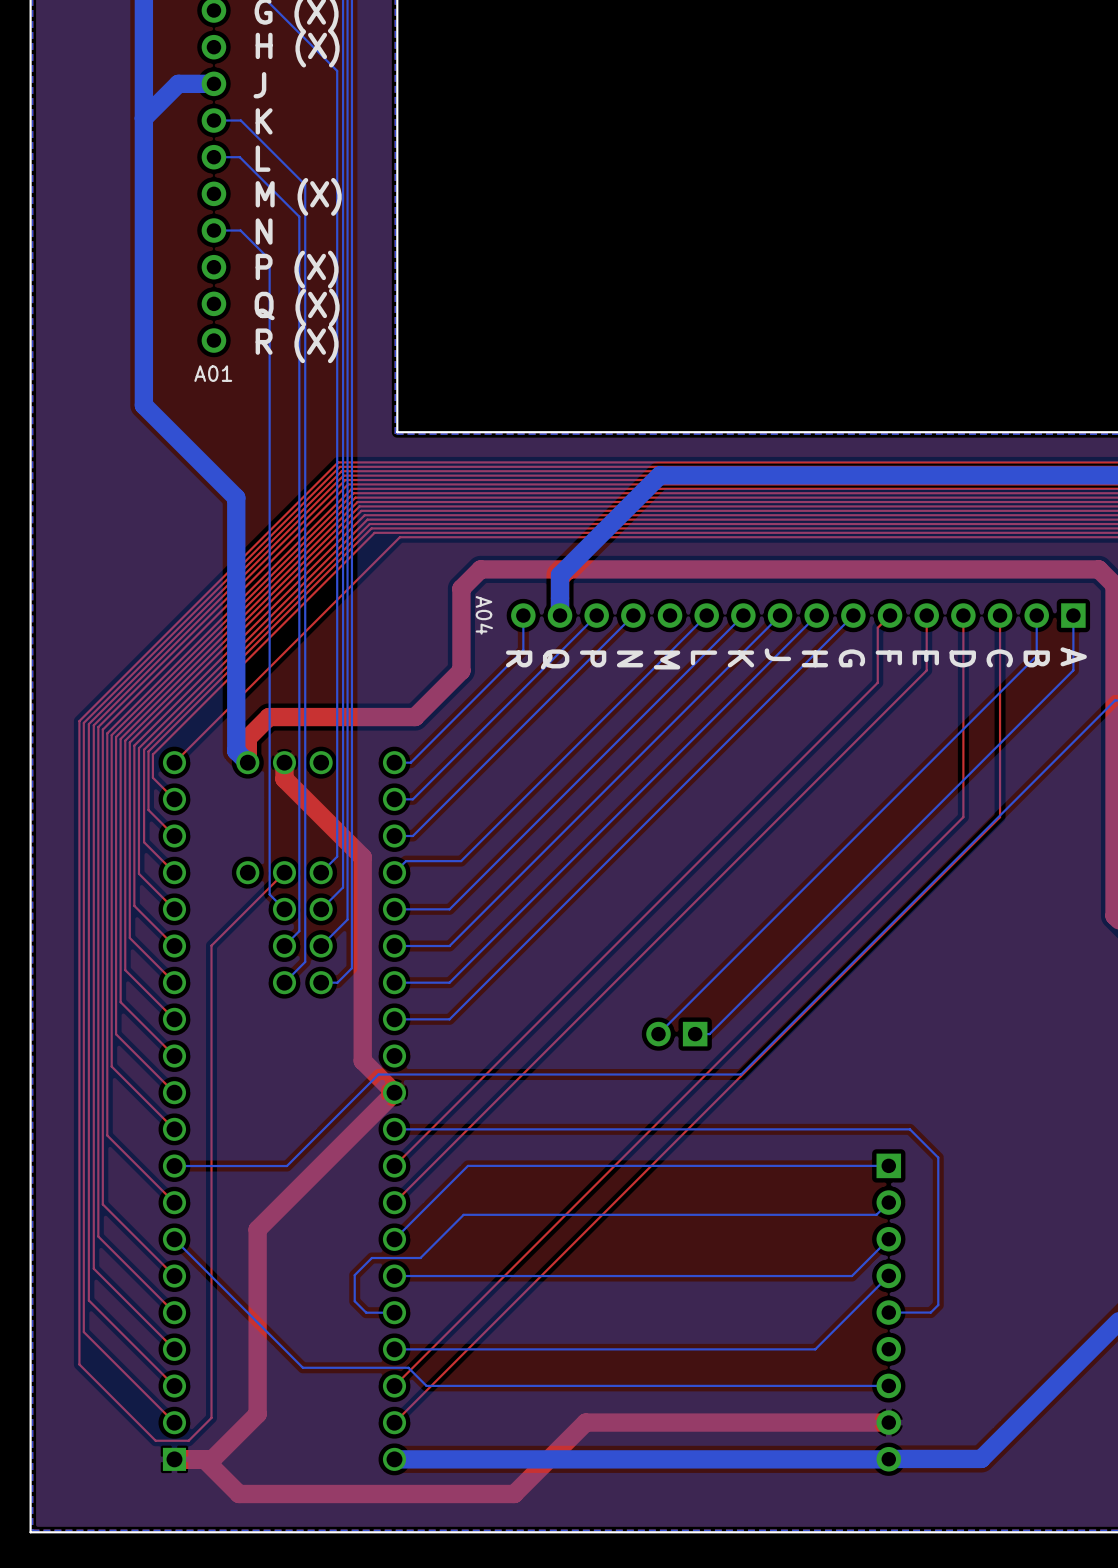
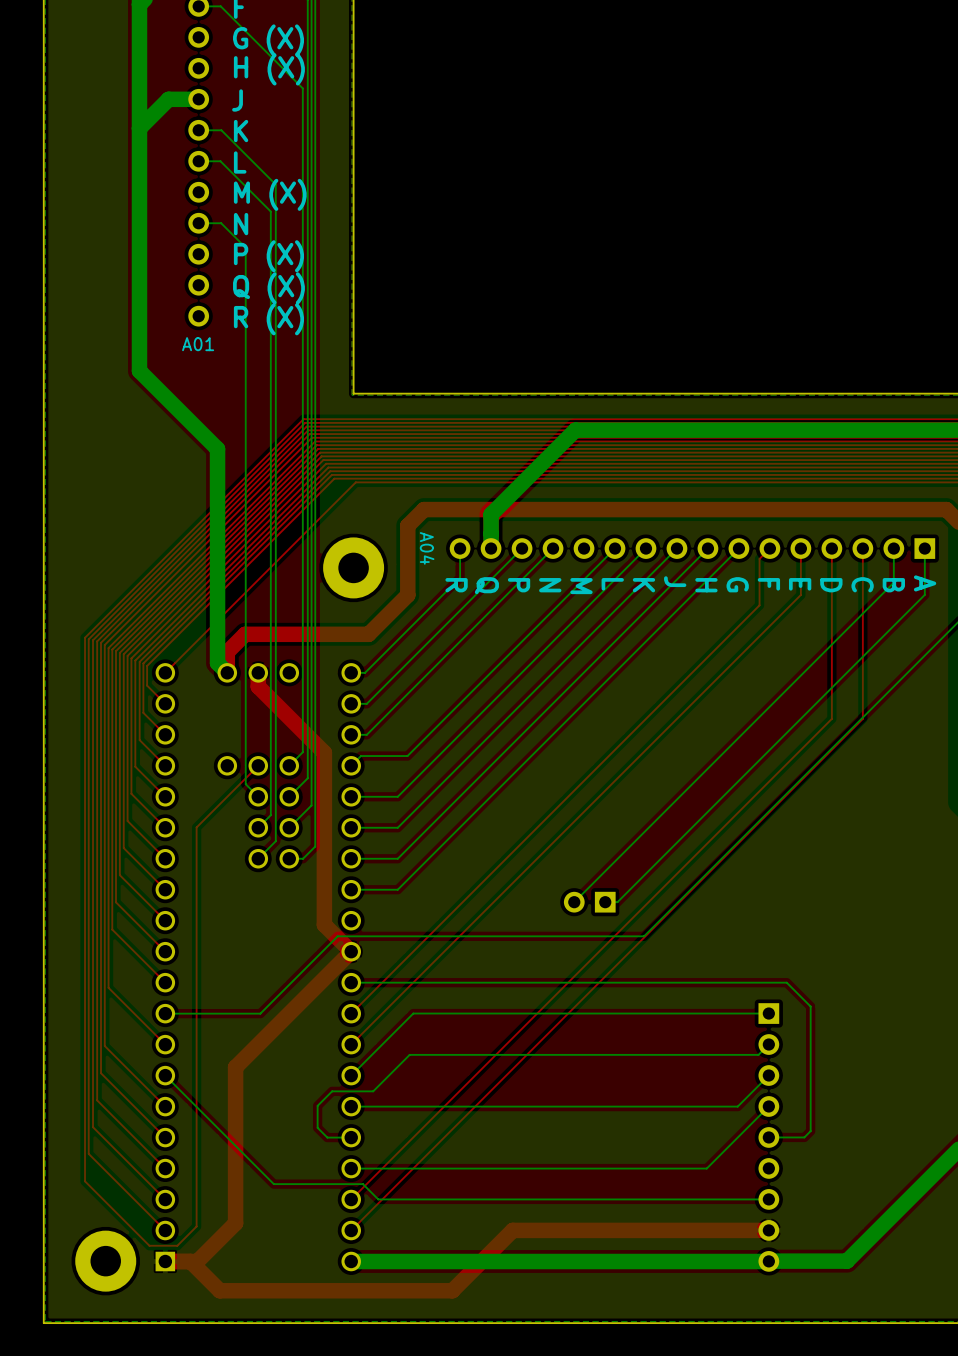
part: none -> (353, 567)
part: none -> (105, 1261)

